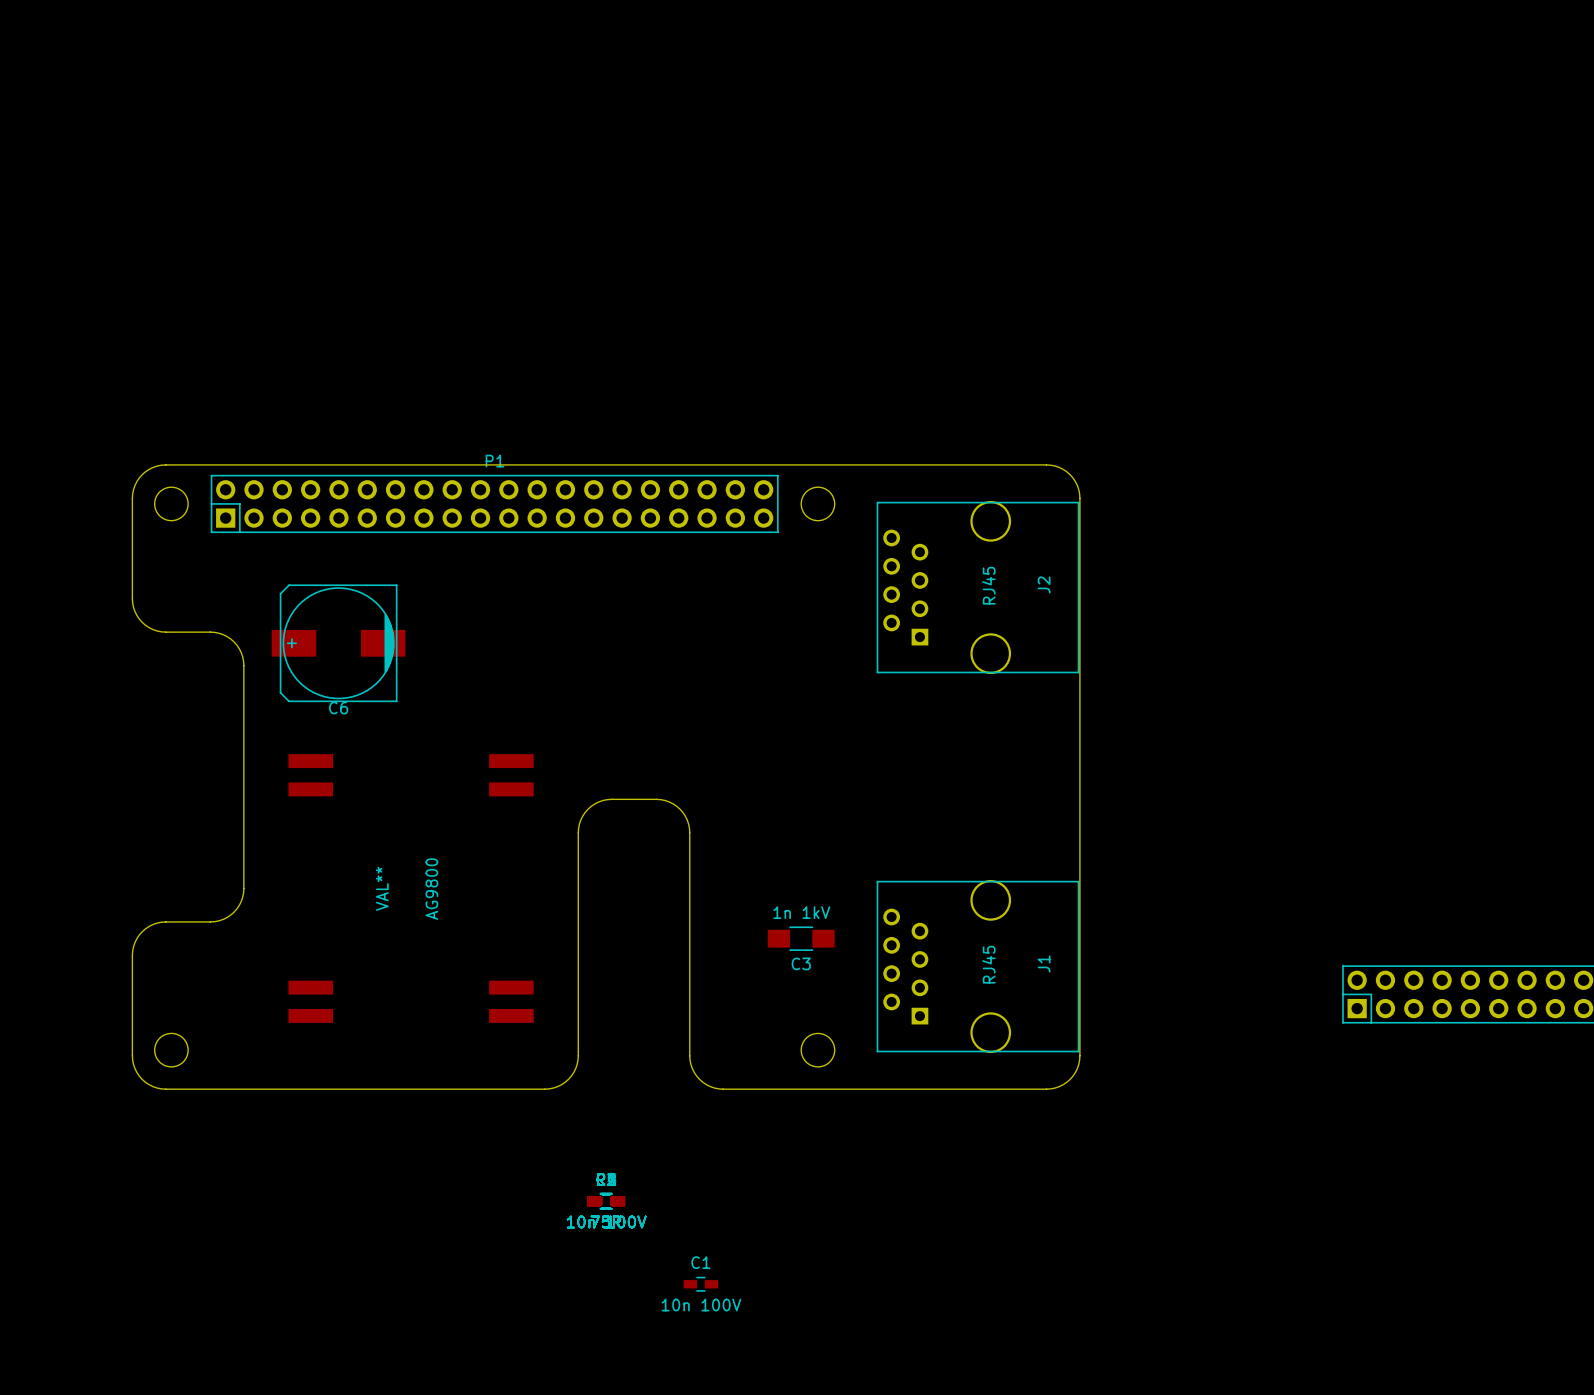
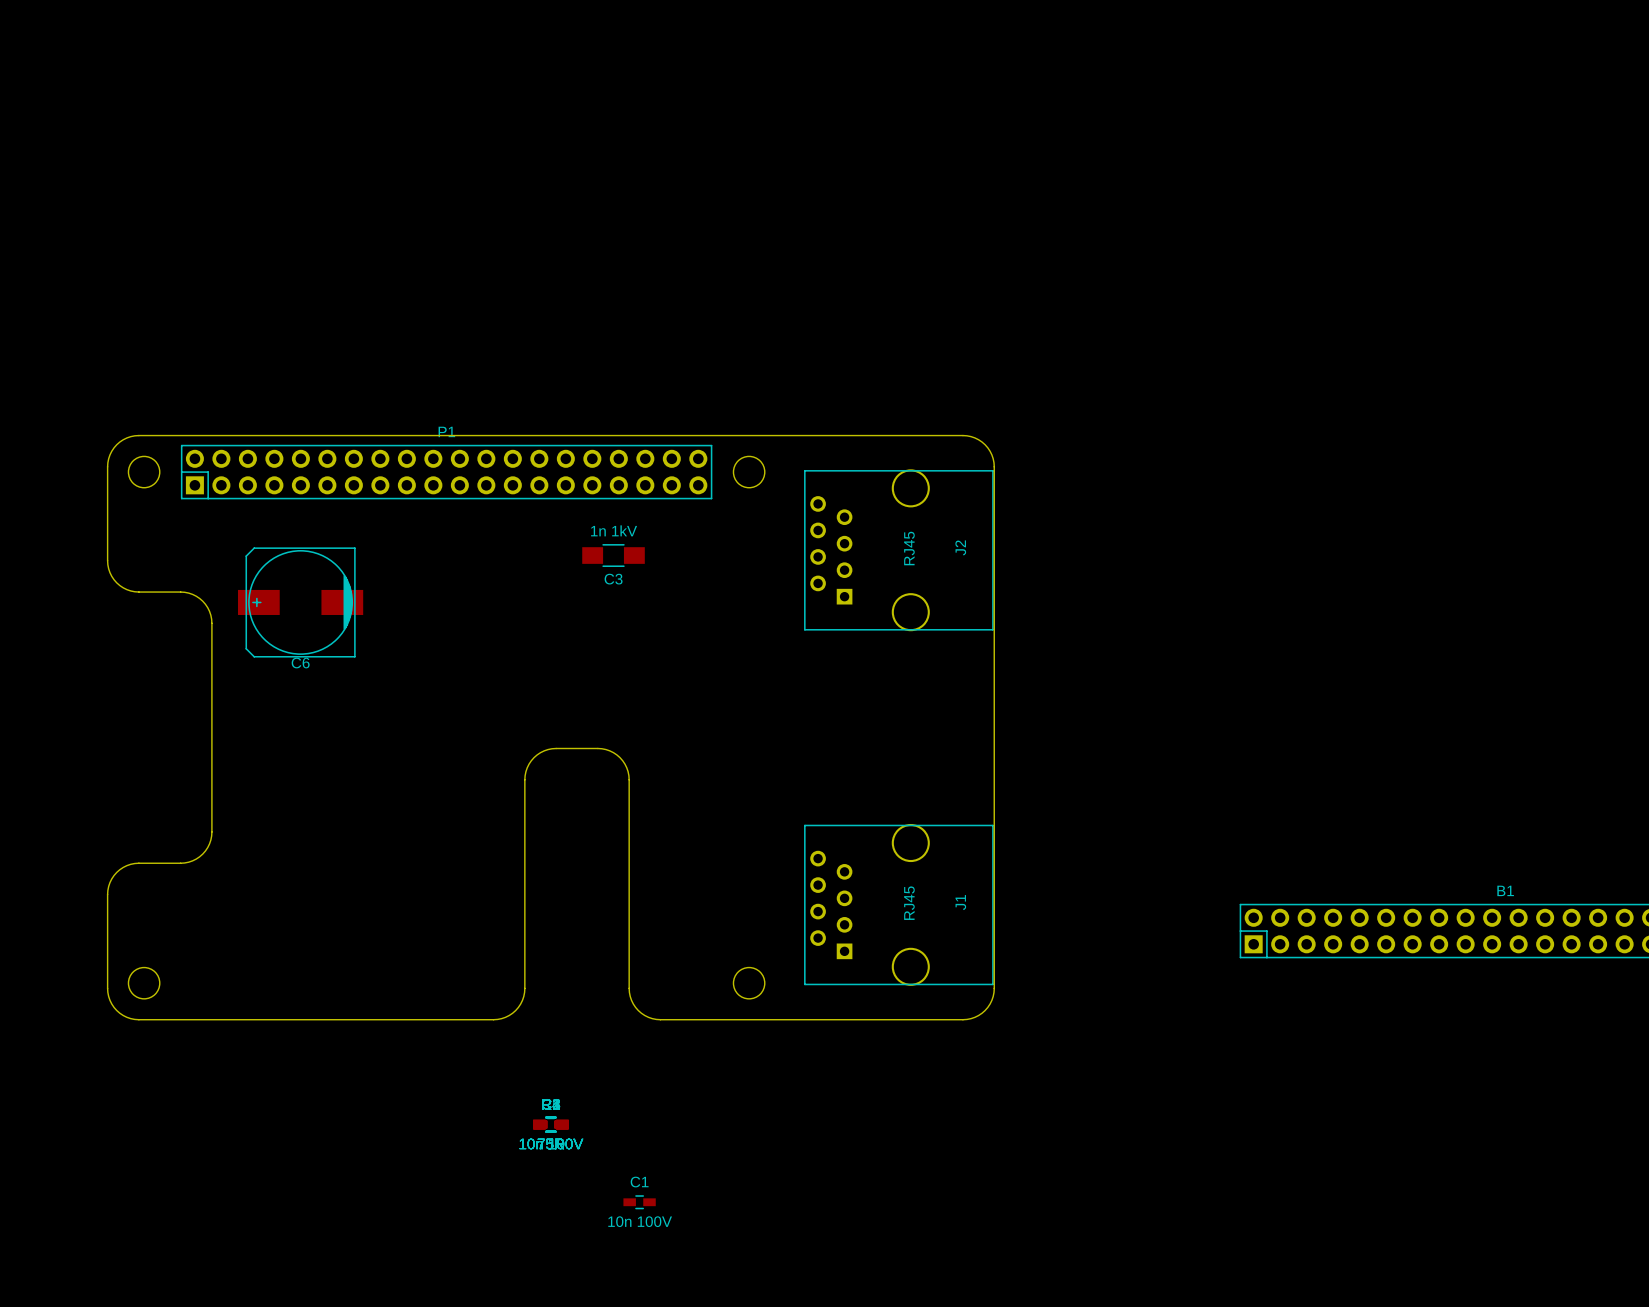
AG9800: VAL** (411, 888) -> none
C3 position: (801, 938) -> (613, 555)

